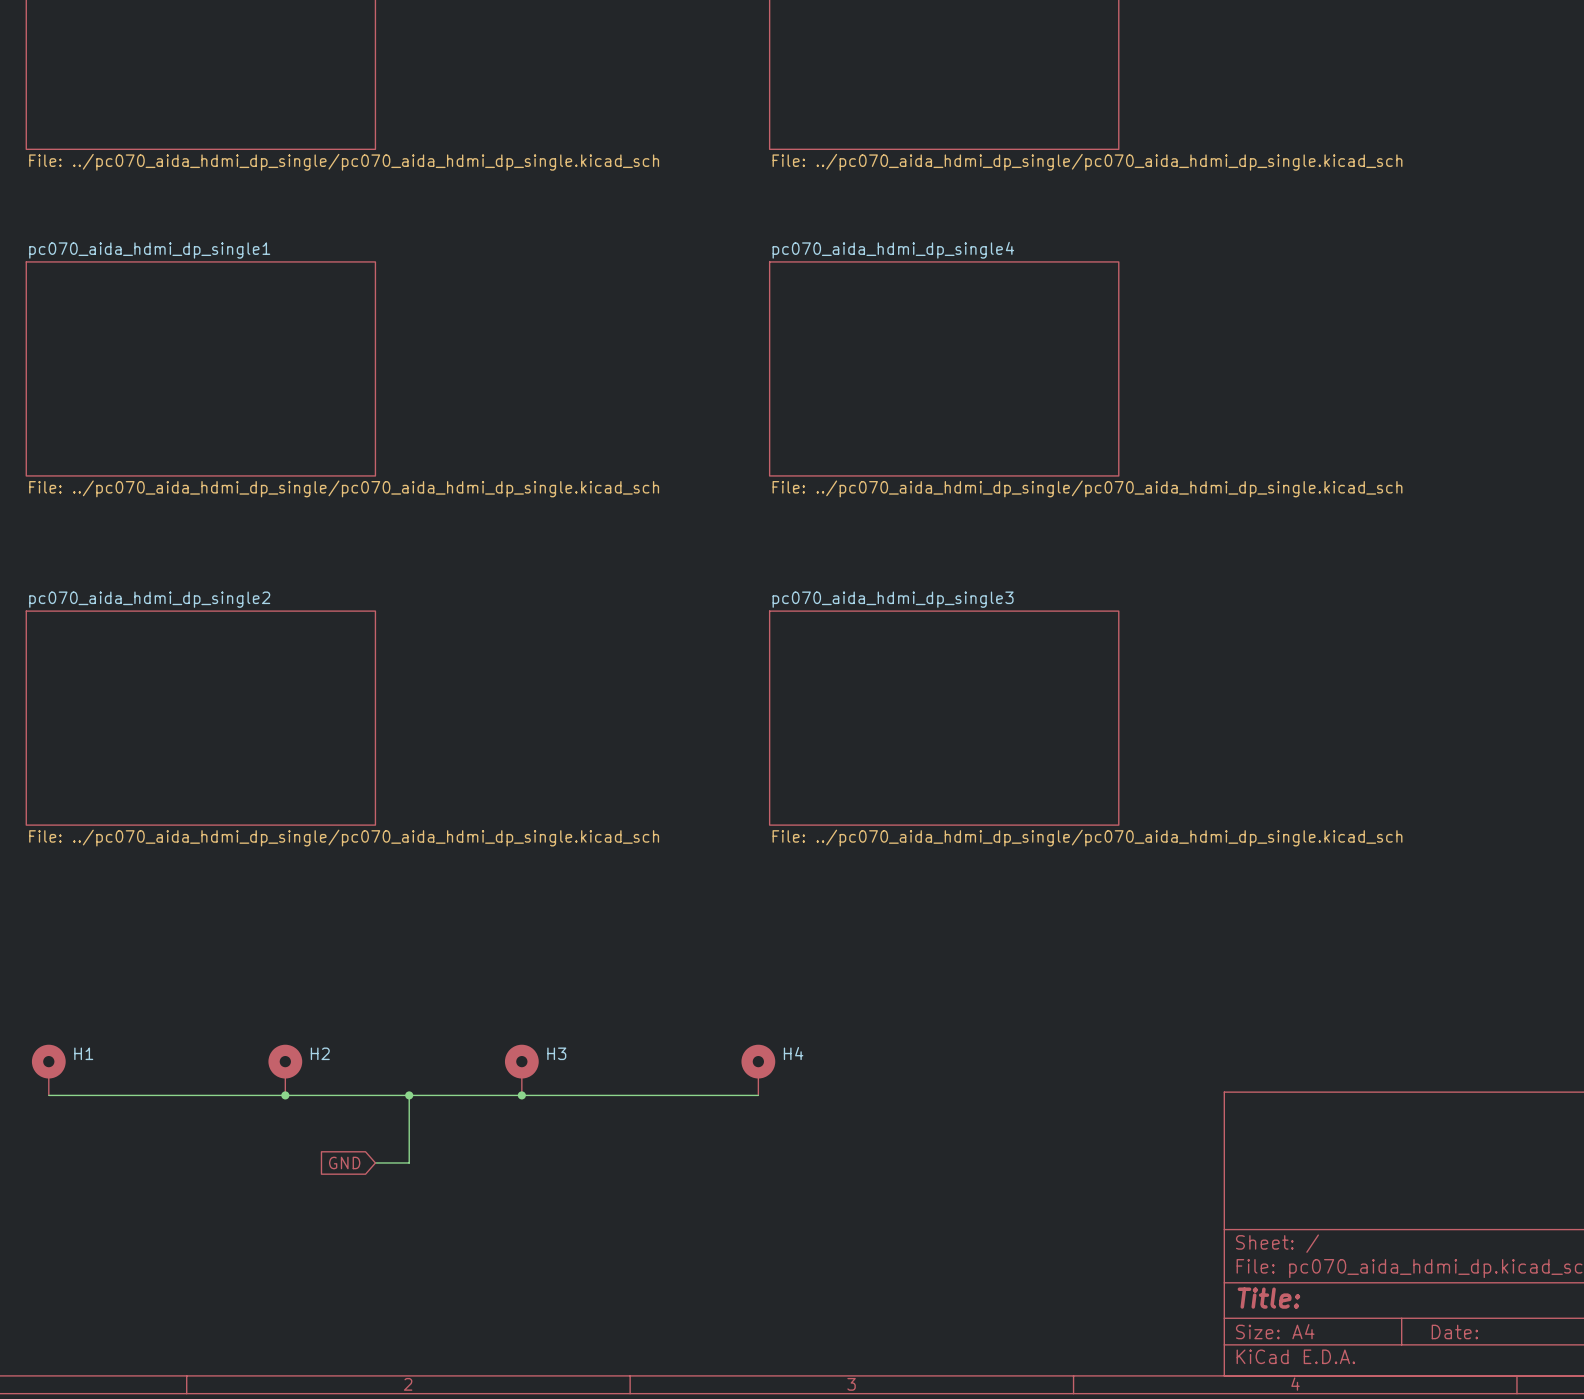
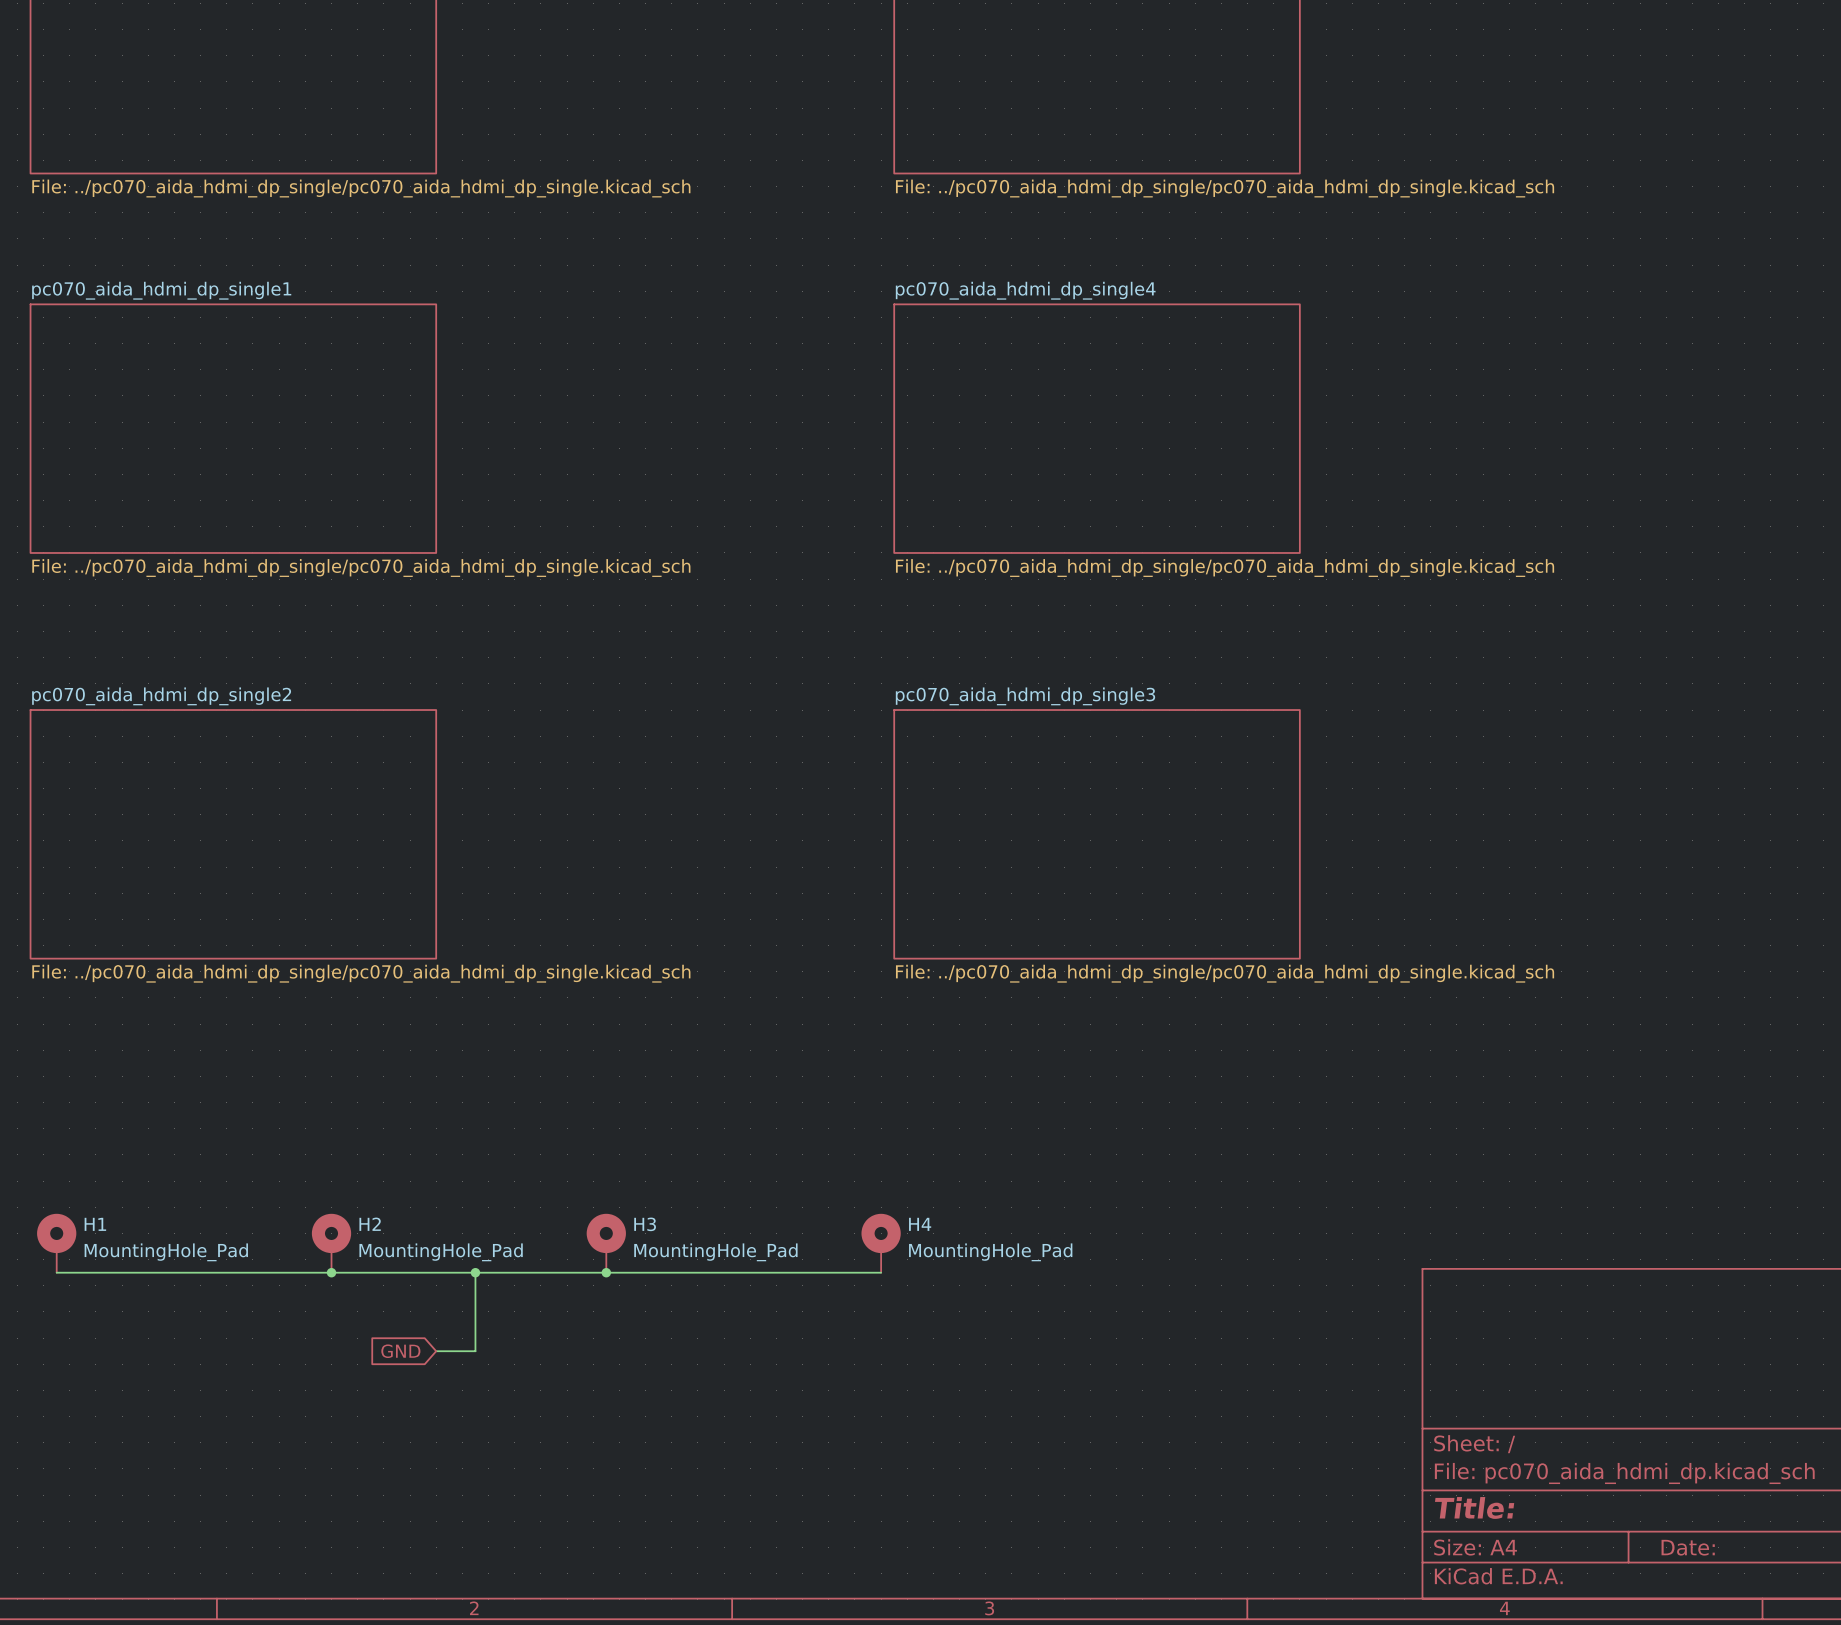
H1 value: none -> MountingHole_Pad (166, 1252)
H2 value: none -> MountingHole_Pad (441, 1252)
H3 value: none -> MountingHole_Pad (715, 1252)
H4 value: none -> MountingHole_Pad (990, 1252)

